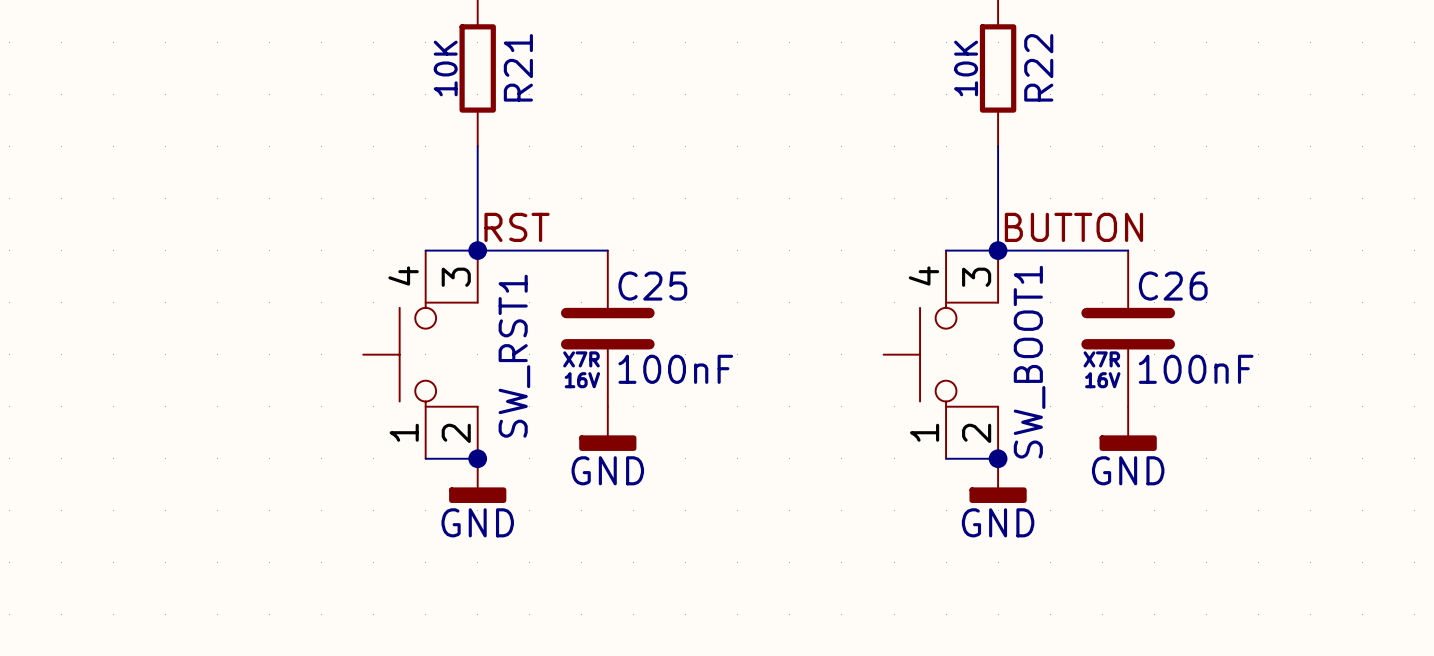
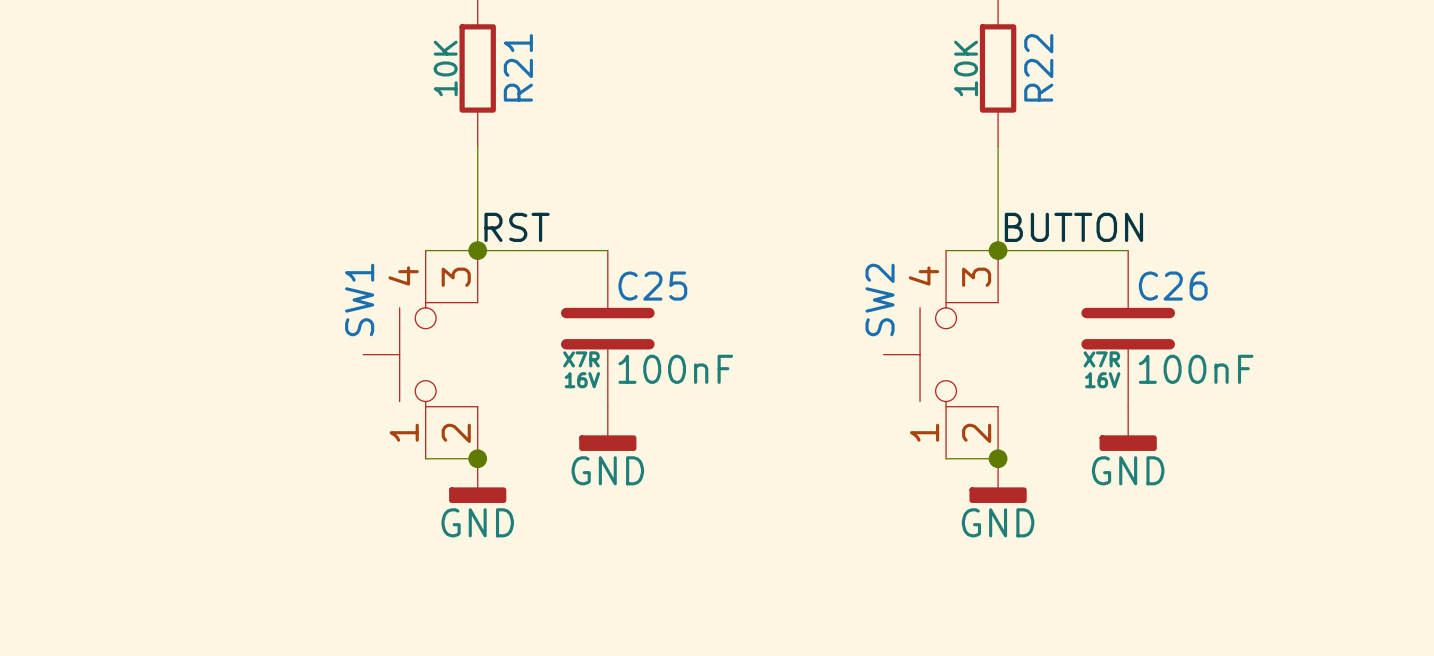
SW_RST1 name: SW_RST1 (514, 356) -> SW1 (359, 299)
SW_BOOT1 name: SW_BOOT1 (1029, 362) -> SW2 (880, 299)

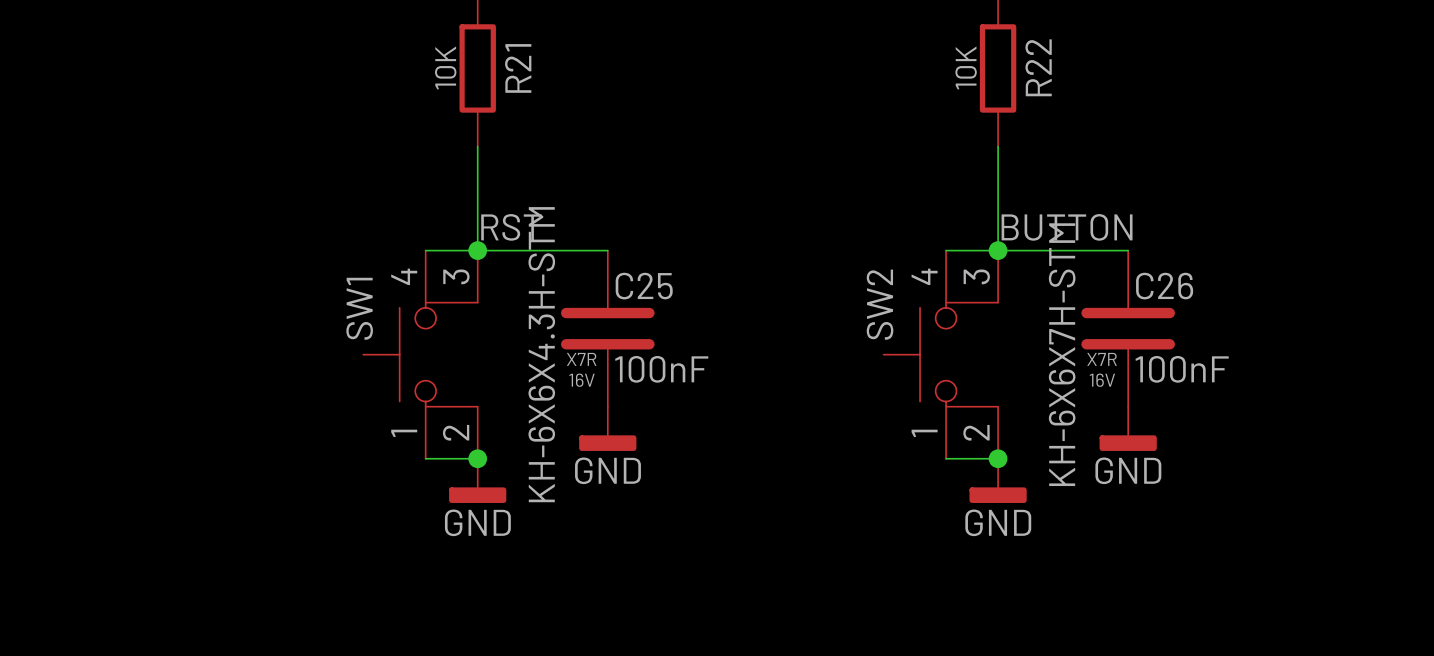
SW1 value: none -> KH-6X6X4.3H-STM (541, 354)
SW2 value: none -> KH-6X6X7H-STM (1062, 354)

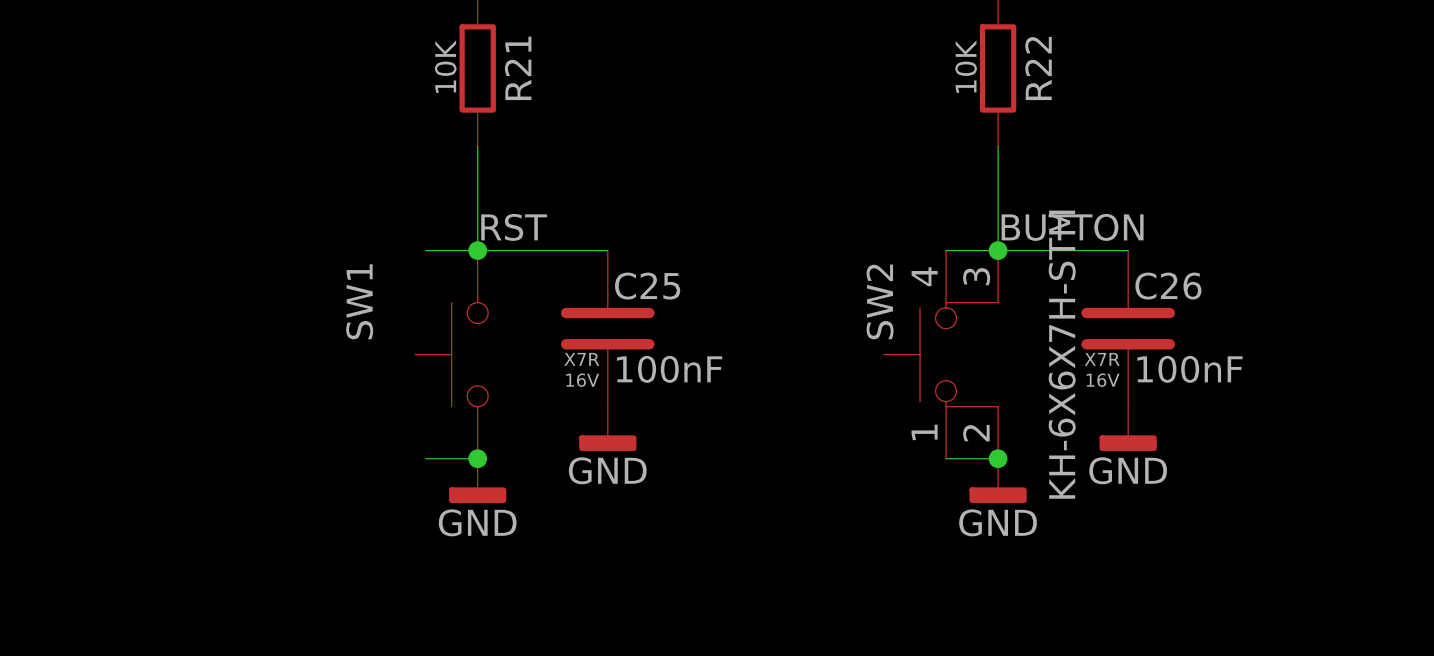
SW1 symbol: [363, 250, 478, 459] -> [415, 250, 489, 459]
SW1 value: KH-6X6X4.3H-STM (541, 354) -> none

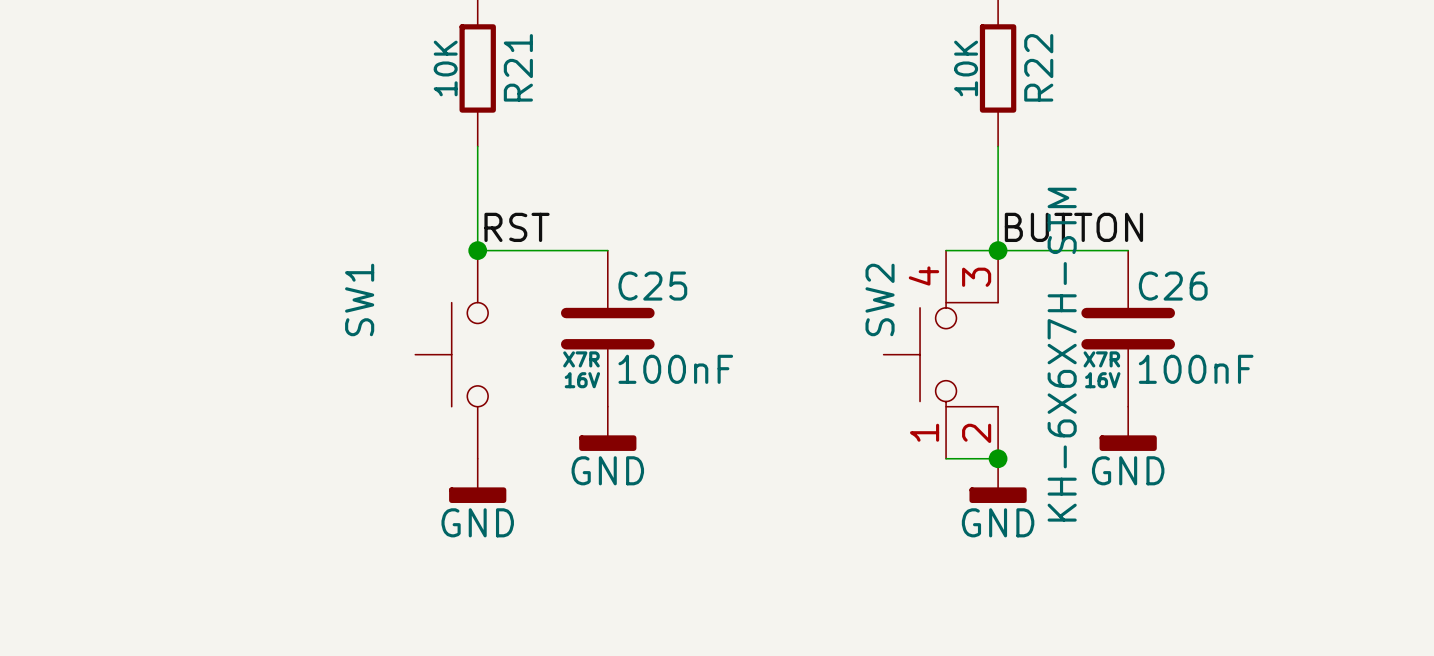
wire: (425, 250) (477, 250) -> none
wire: (425, 458) (477, 458) -> none
junction: (477, 458) -> none

